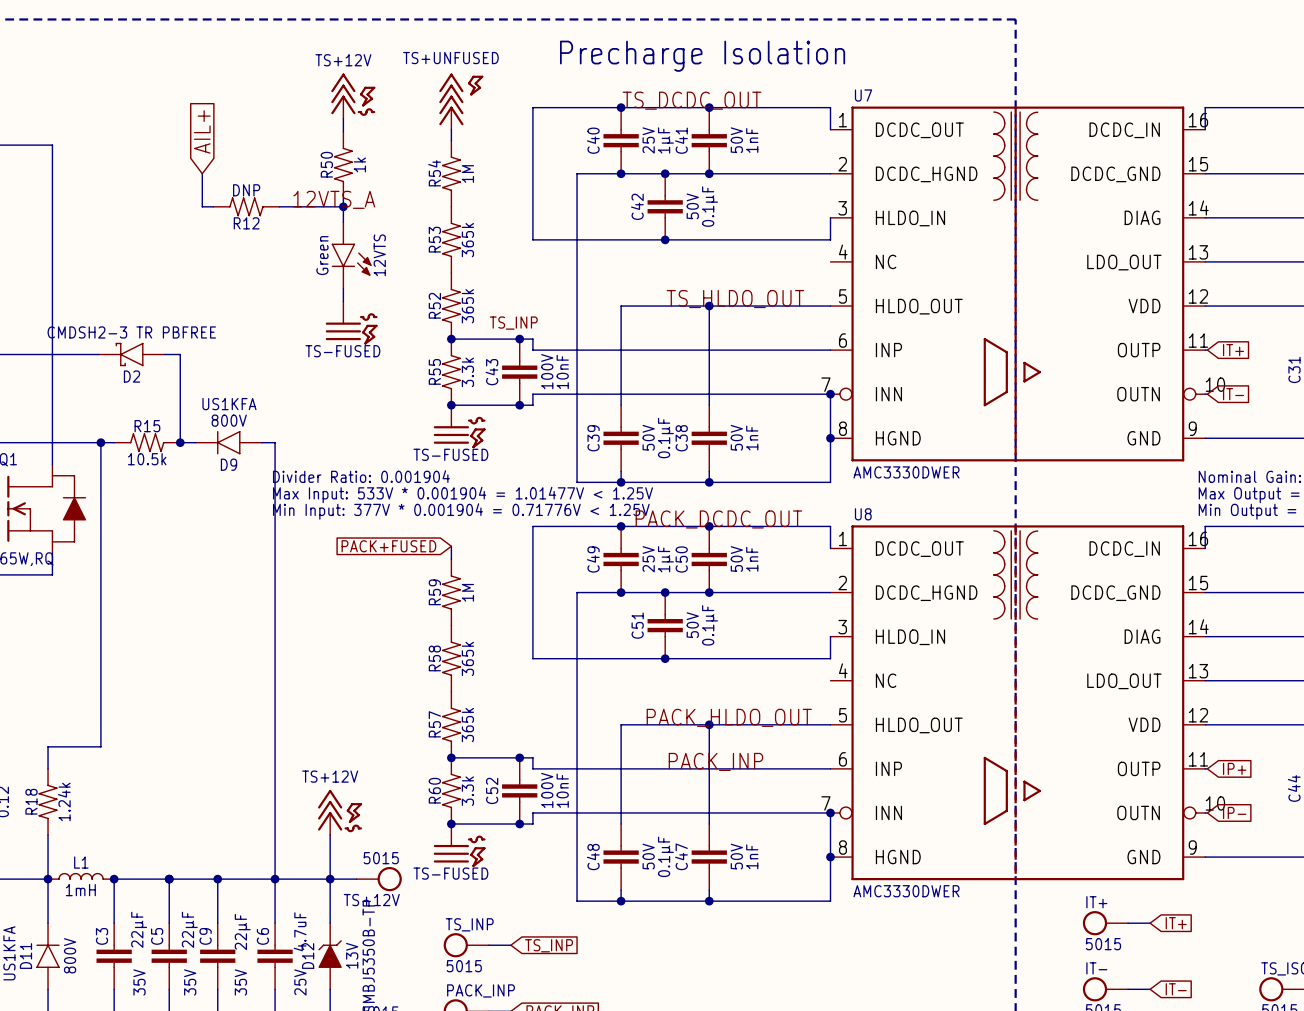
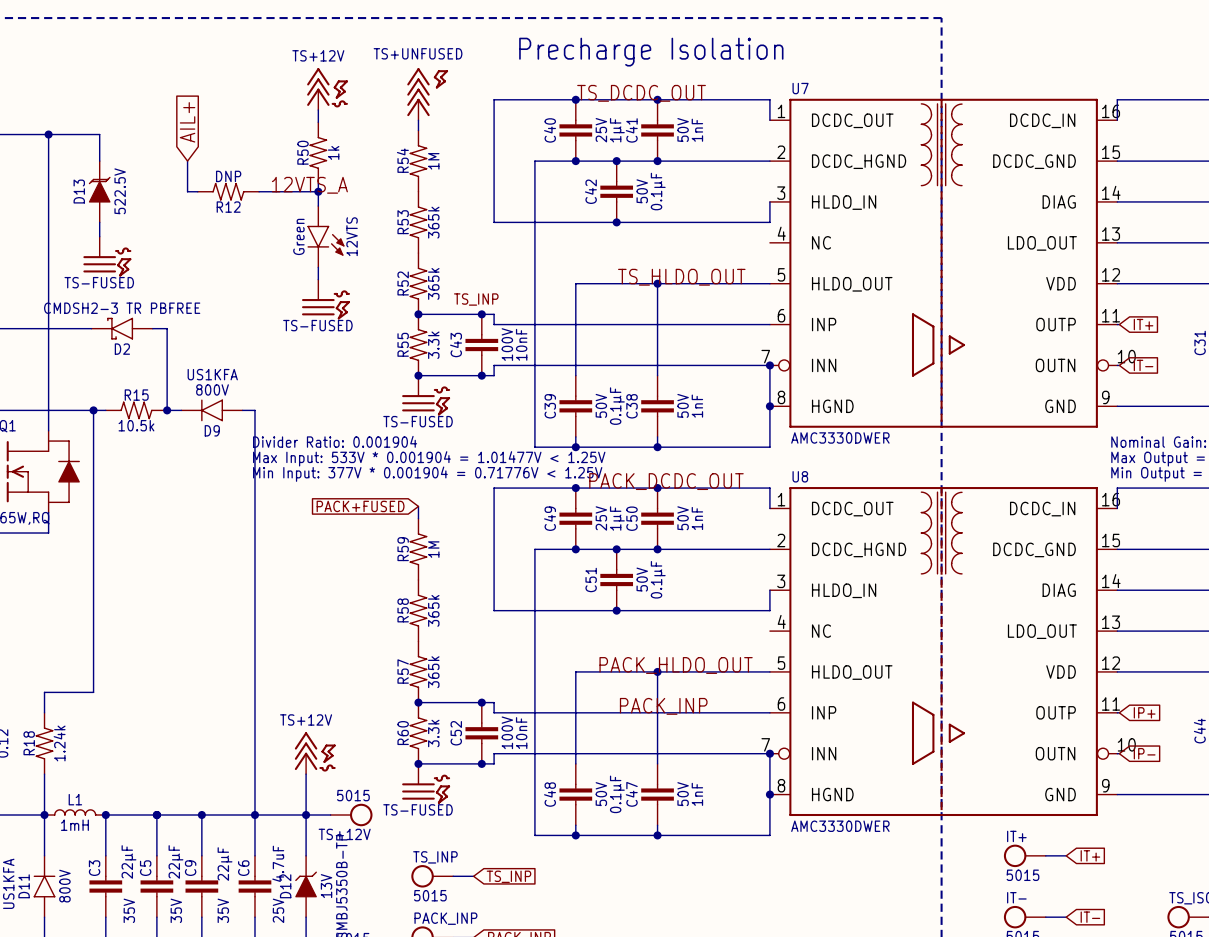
wire: none -> (48, 134) (99, 134) (99, 161)
junction: none -> (48, 134)
D13: none -> (99, 191)
wire: none -> (99, 222) (99, 236)
power symbol: none -> TS-FUSED (107, 256)

